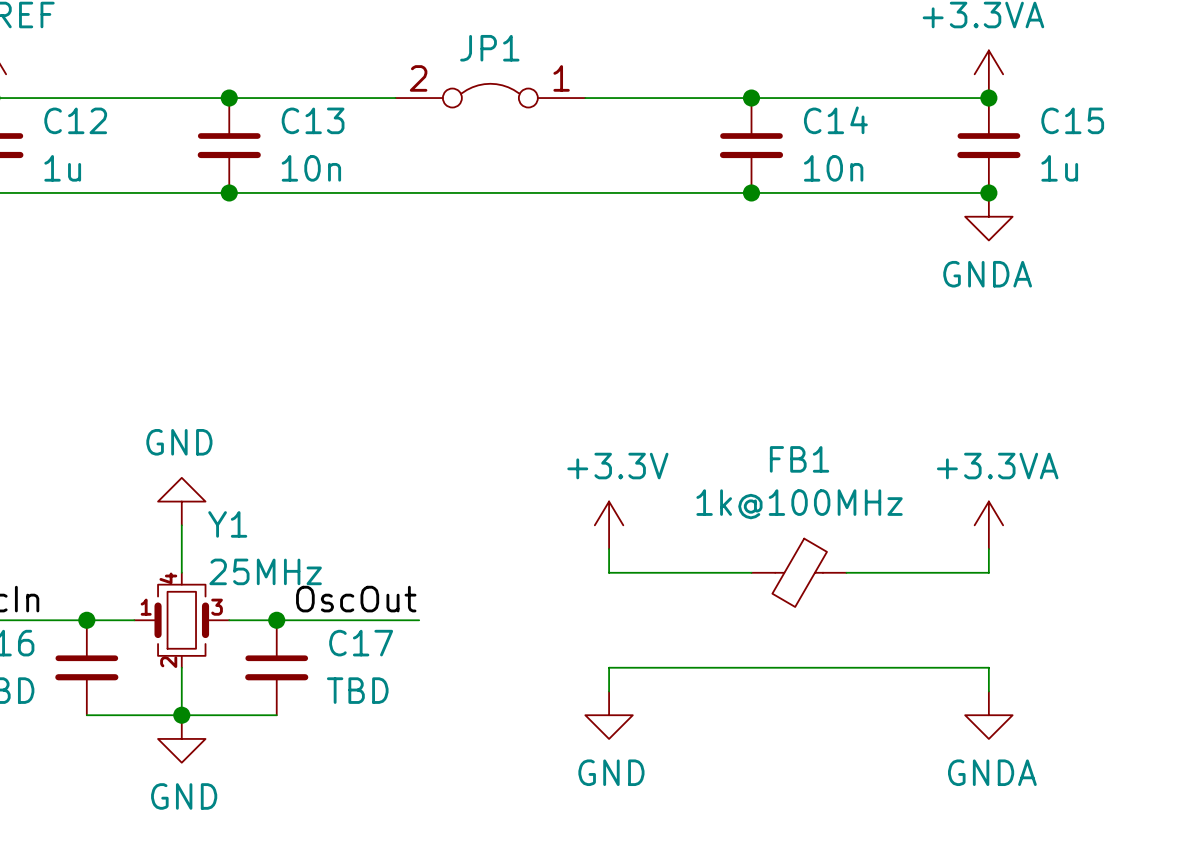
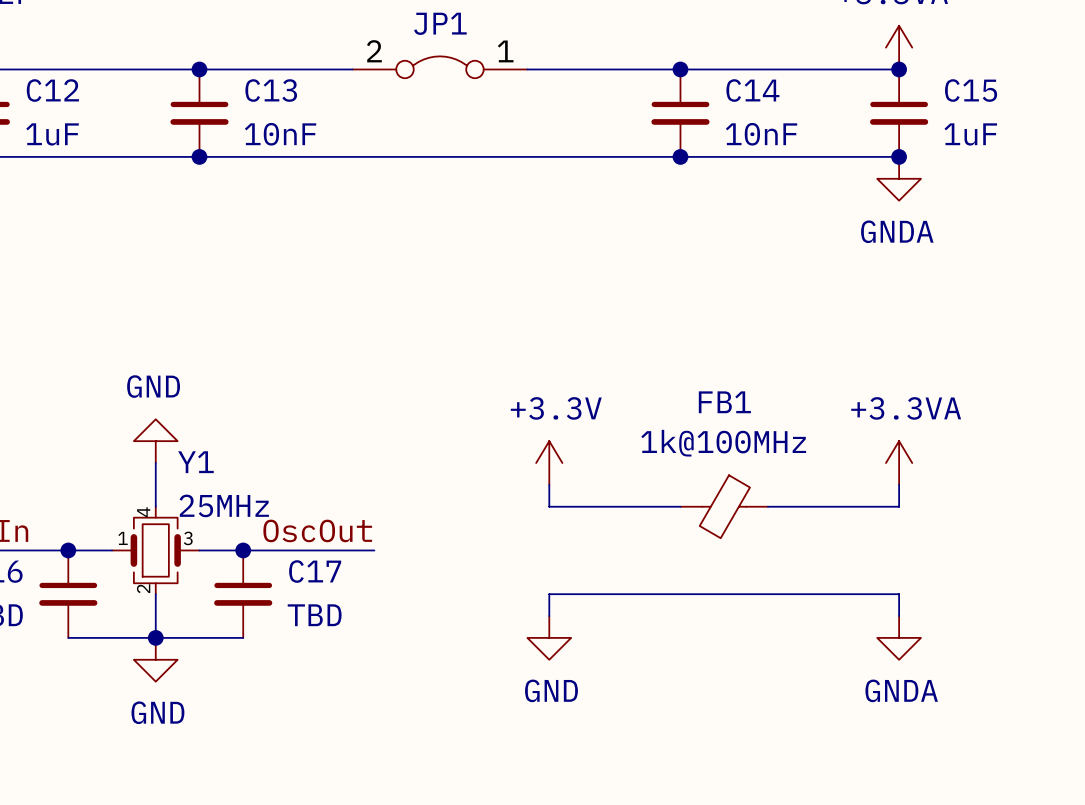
C12 value: 1u (62, 168) -> 1uF (52, 134)
C13 value: 10n (311, 168) -> 10nF (280, 134)
C14 value: 10n (833, 168) -> 10nF (761, 134)
C15 value: 1u (1059, 168) -> 1uF (970, 134)

